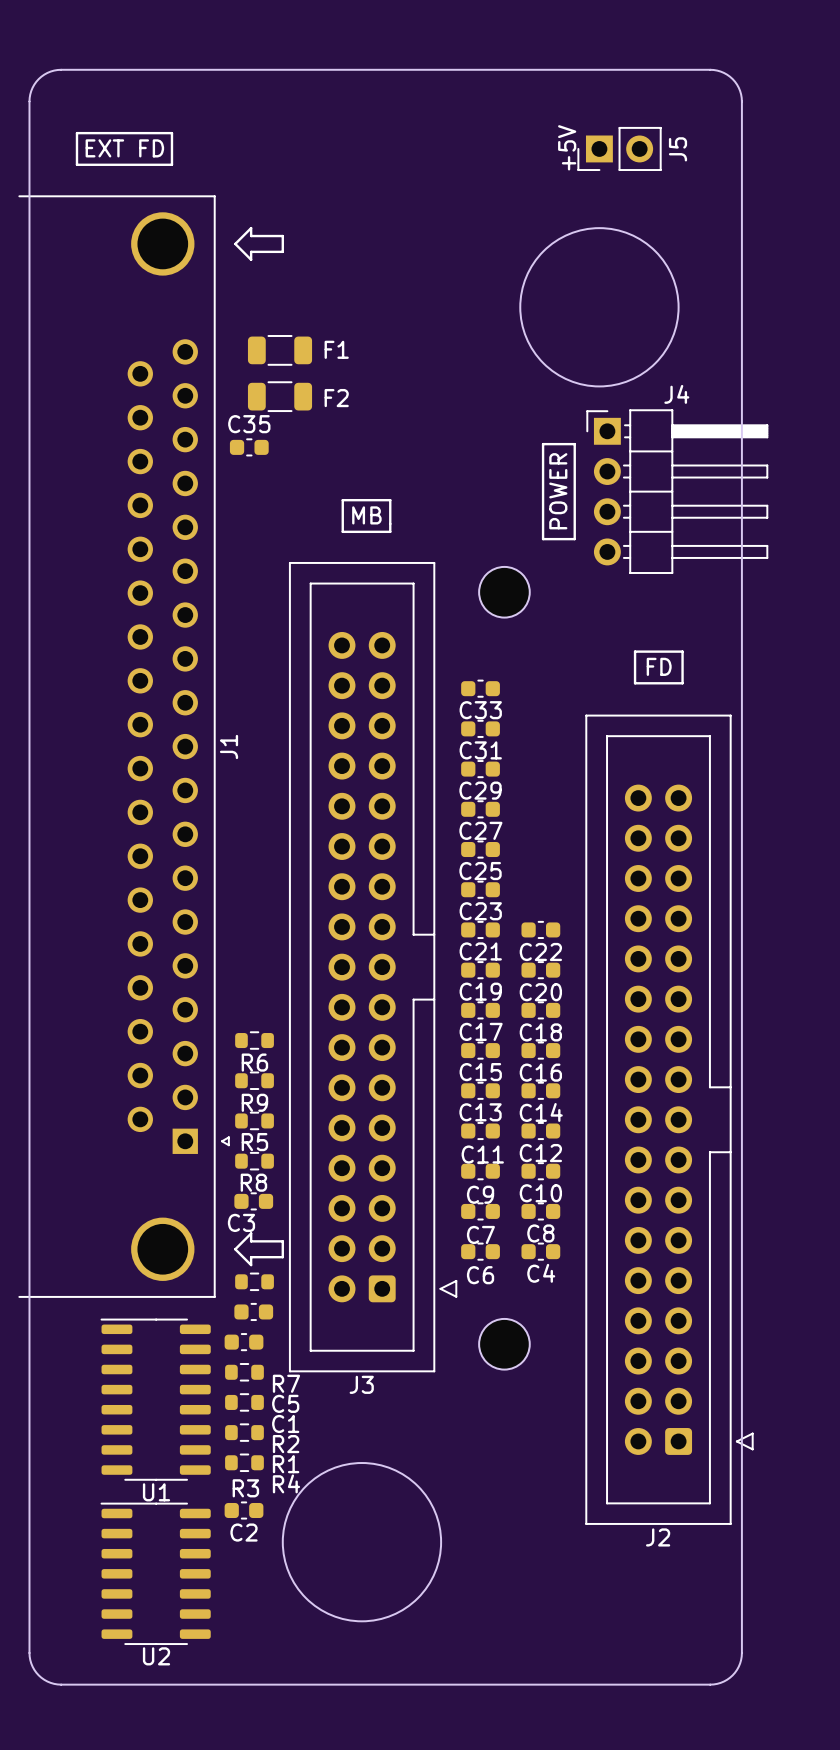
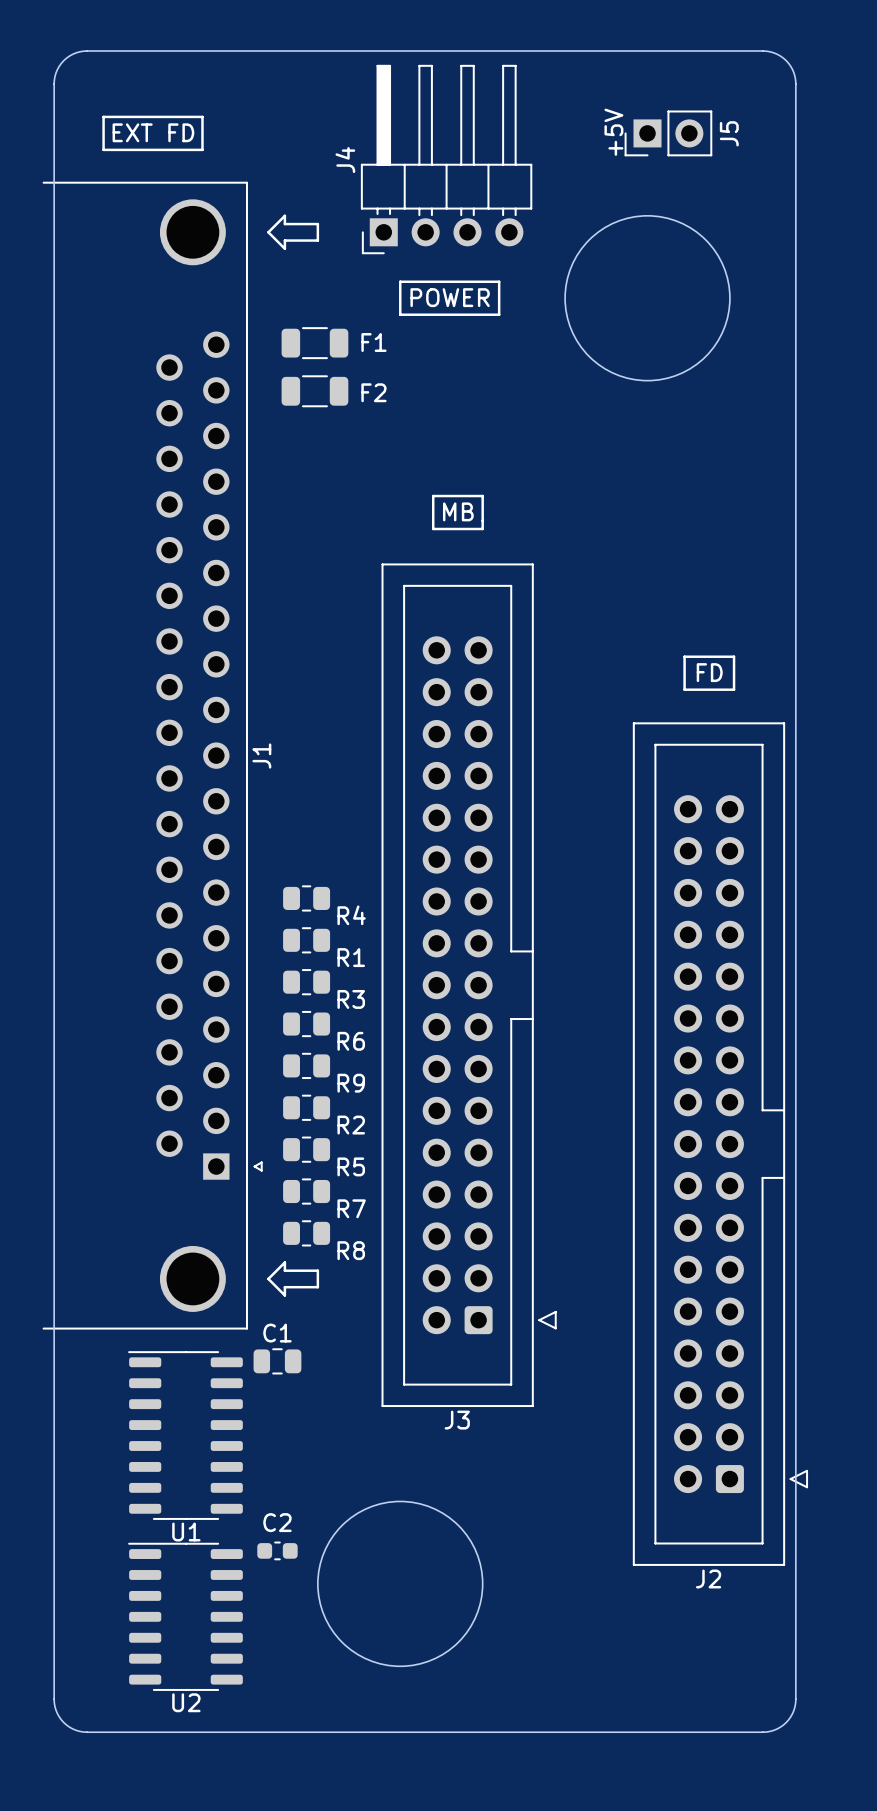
line: none -> (400, 281) (499, 281) (499, 314) (400, 314) (400, 281)
line: (543, 444) (574, 444) (574, 539) (543, 539) (543, 444) -> none
C35: (249, 447) -> none
text rotation: 0° (558, 491) -> 90° clockwise (450, 297)
text position: POWER (558, 491) -> POWER (450, 297)
J4 rotation: 0° (677, 491) -> 90° counterclockwise (446, 159)
J4 position: (677, 491) -> (446, 159)
line: (342, 500) (342, 531) (390, 531) (390, 500) (342, 500) -> (433, 496) (433, 528) (482, 528) (482, 496) (433, 496)
text position: MB (366, 515) -> MB (458, 511)
part: (504, 592) -> none
C33: (480, 688) -> none
C31: (480, 728) -> none
C29: (480, 769) -> none
C27: (480, 809) -> none
C25: (480, 849) -> none
C23: (480, 889) -> none
C21: (480, 929) -> none
C22: (540, 929) -> none
J3 position: (373, 967) -> (469, 985)
C19: (480, 970) -> none
C20: (540, 970) -> none
C17: (480, 1010) -> none
C18: (540, 1010) -> none
R6 footprint: [235, 1031, 274, 1050] -> [283, 1010, 331, 1038]
C15: (480, 1050) -> none
C16: (540, 1050) -> none
R6 name position: R6 (254, 1062) -> R6 (351, 1041)
R9 footprint: [235, 1071, 274, 1090] -> [283, 1052, 331, 1080]
C13: (480, 1090) -> none
C14: (540, 1090) -> none
R9 name position: R9 (254, 1102) -> R9 (351, 1083)
R5 footprint: [235, 1111, 274, 1131] -> [283, 1136, 331, 1163]
C11: (480, 1131) -> none
C12: (540, 1131) -> none
R5 name position: R5 (254, 1142) -> R5 (351, 1166)
R8 footprint: [235, 1151, 274, 1171] -> [283, 1220, 331, 1247]
C9: (480, 1171) -> none
C10: (540, 1171) -> none
R8 name position: R8 (253, 1182) -> R8 (351, 1250)
C3: (253, 1201) -> none
C7: (480, 1211) -> none
C8: (540, 1211) -> none
C6: (480, 1251) -> none
C4: (540, 1251) -> none
R7 footprint: [235, 1272, 274, 1292] -> [283, 1178, 331, 1205]
C5: (253, 1311) -> none
C1 footprint: [224, 1333, 264, 1352] -> [253, 1348, 302, 1375]
part: (504, 1344) -> none
R2 footprint: [225, 1363, 264, 1382] -> [283, 1094, 331, 1121]
R7 name position: R7 (286, 1383) -> R7 (351, 1208)
R1 footprint: [225, 1393, 264, 1412] -> [283, 927, 331, 954]
R4 footprint: [225, 1423, 264, 1442] -> [283, 885, 331, 912]
C1 name position: C1 (285, 1423) -> C1 (277, 1333)
R2 name position: R2 (286, 1444) -> R2 (351, 1125)
R3 footprint: [225, 1453, 264, 1472] -> [283, 969, 331, 996]
R1 name position: R1 (286, 1464) -> R1 (351, 957)
R4 name position: R4 (286, 1483) -> R4 (351, 915)
R3 name position: R3 (245, 1488) -> R3 (351, 999)
C2 name position: C2 (244, 1532) -> C2 (277, 1522)

